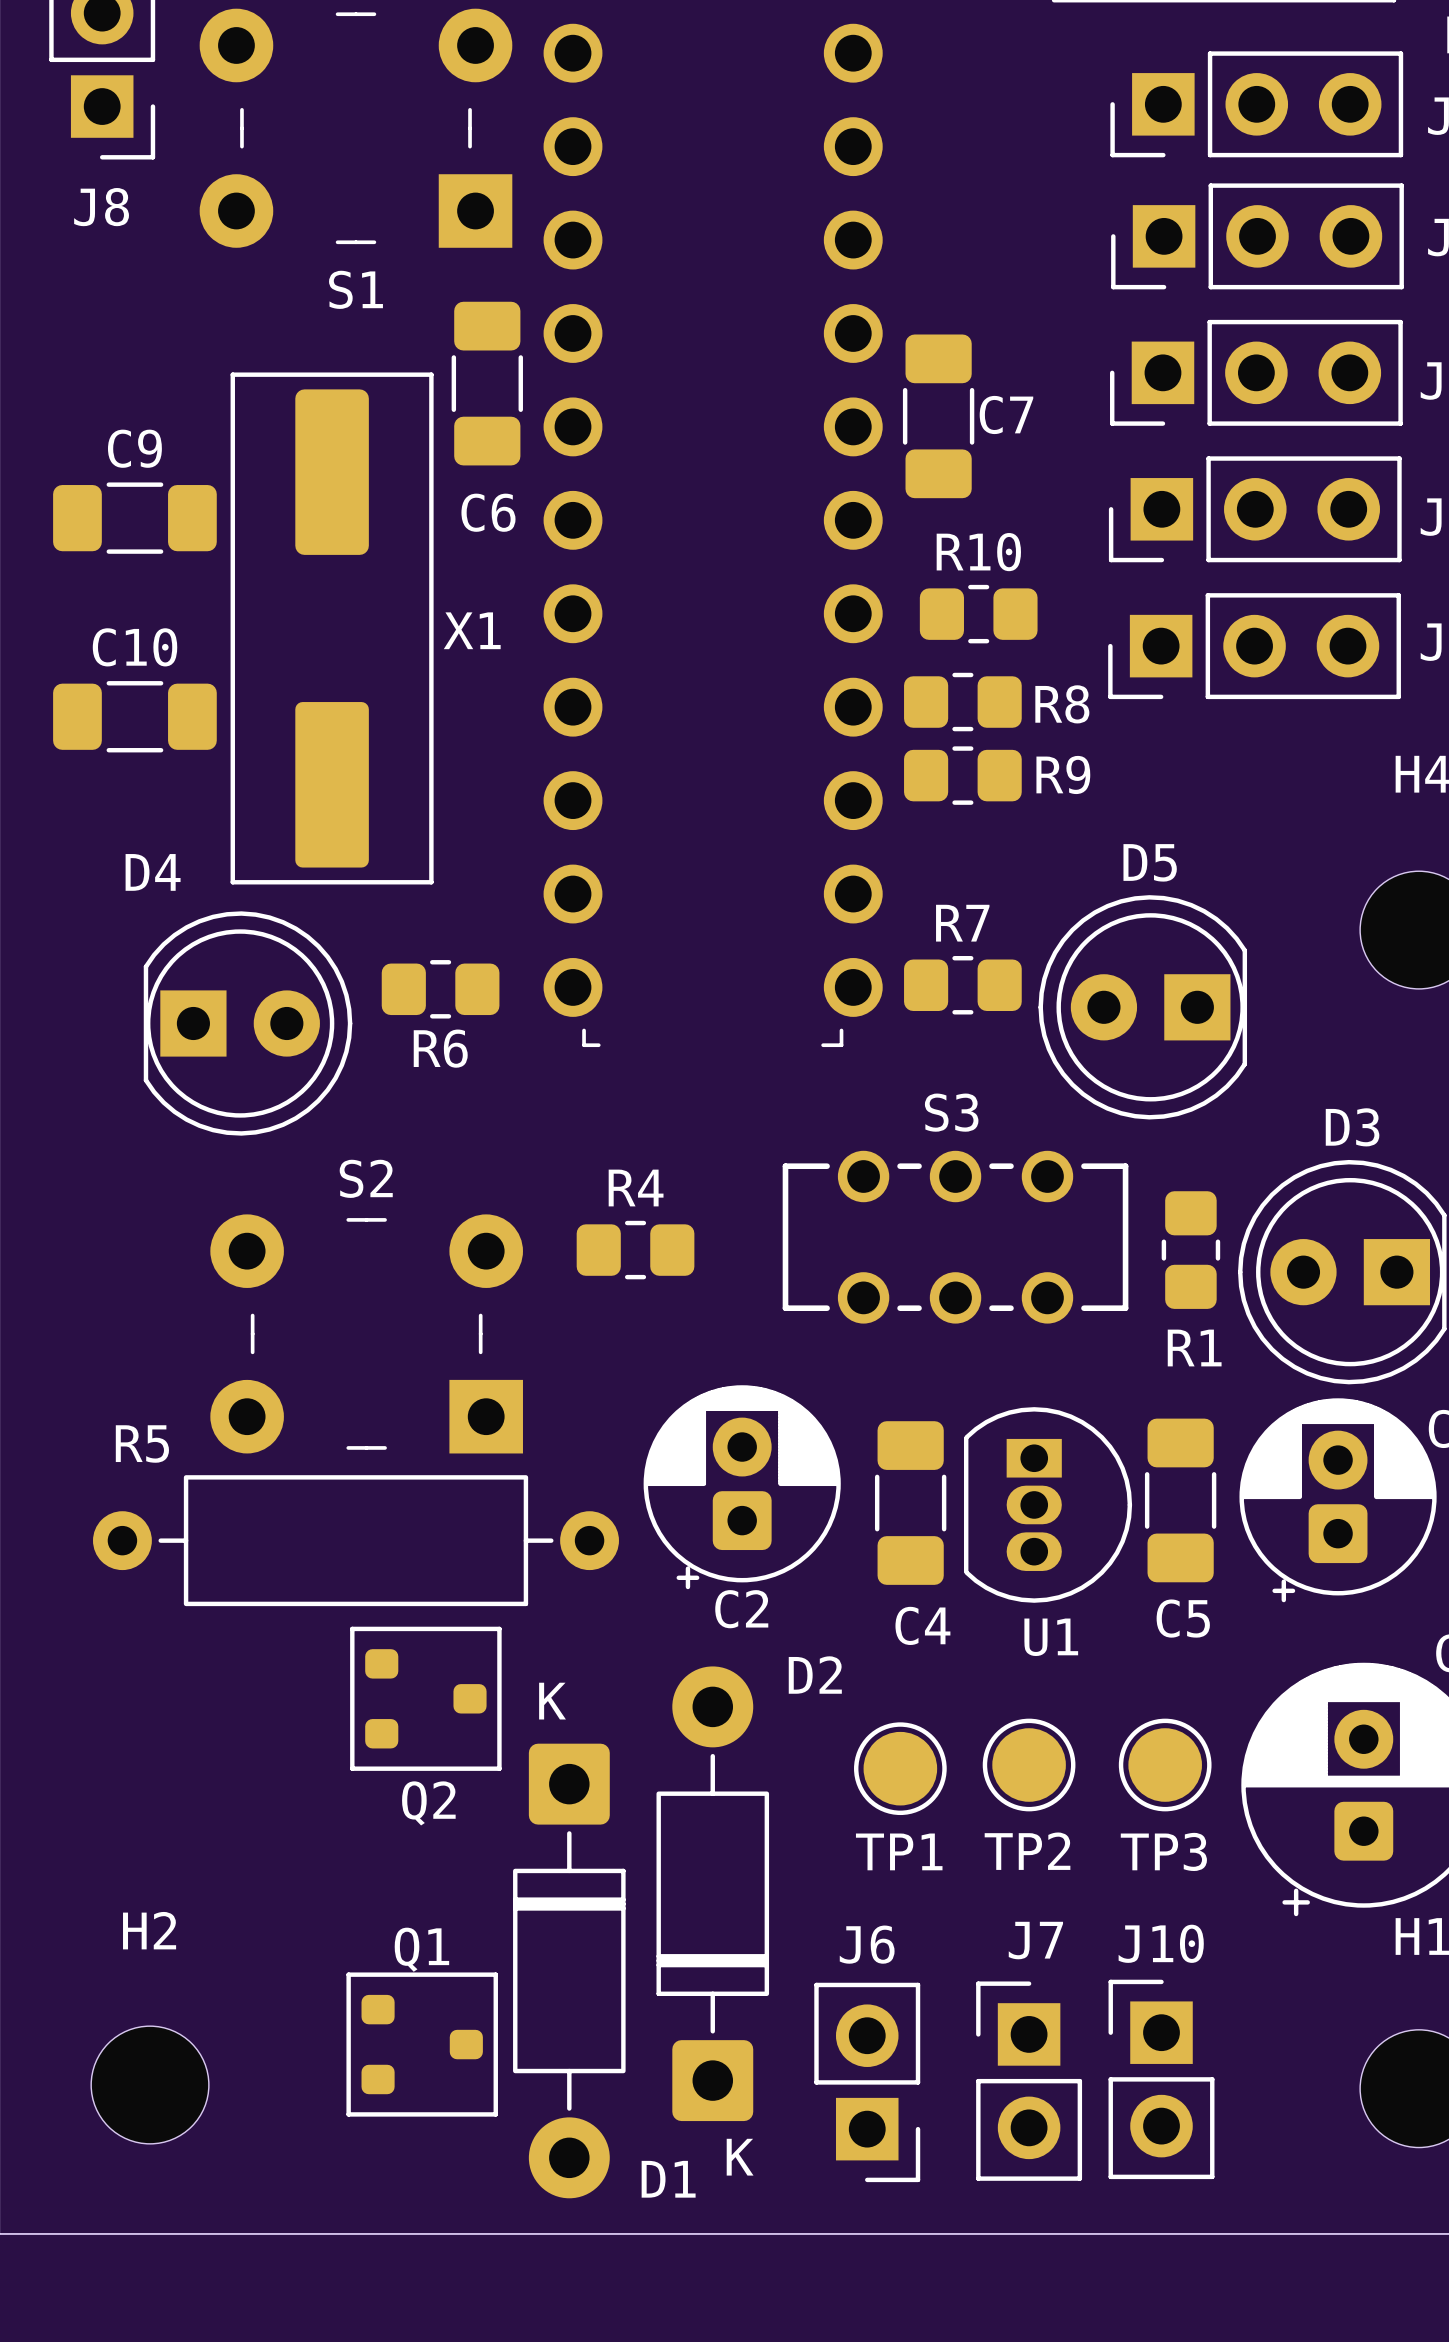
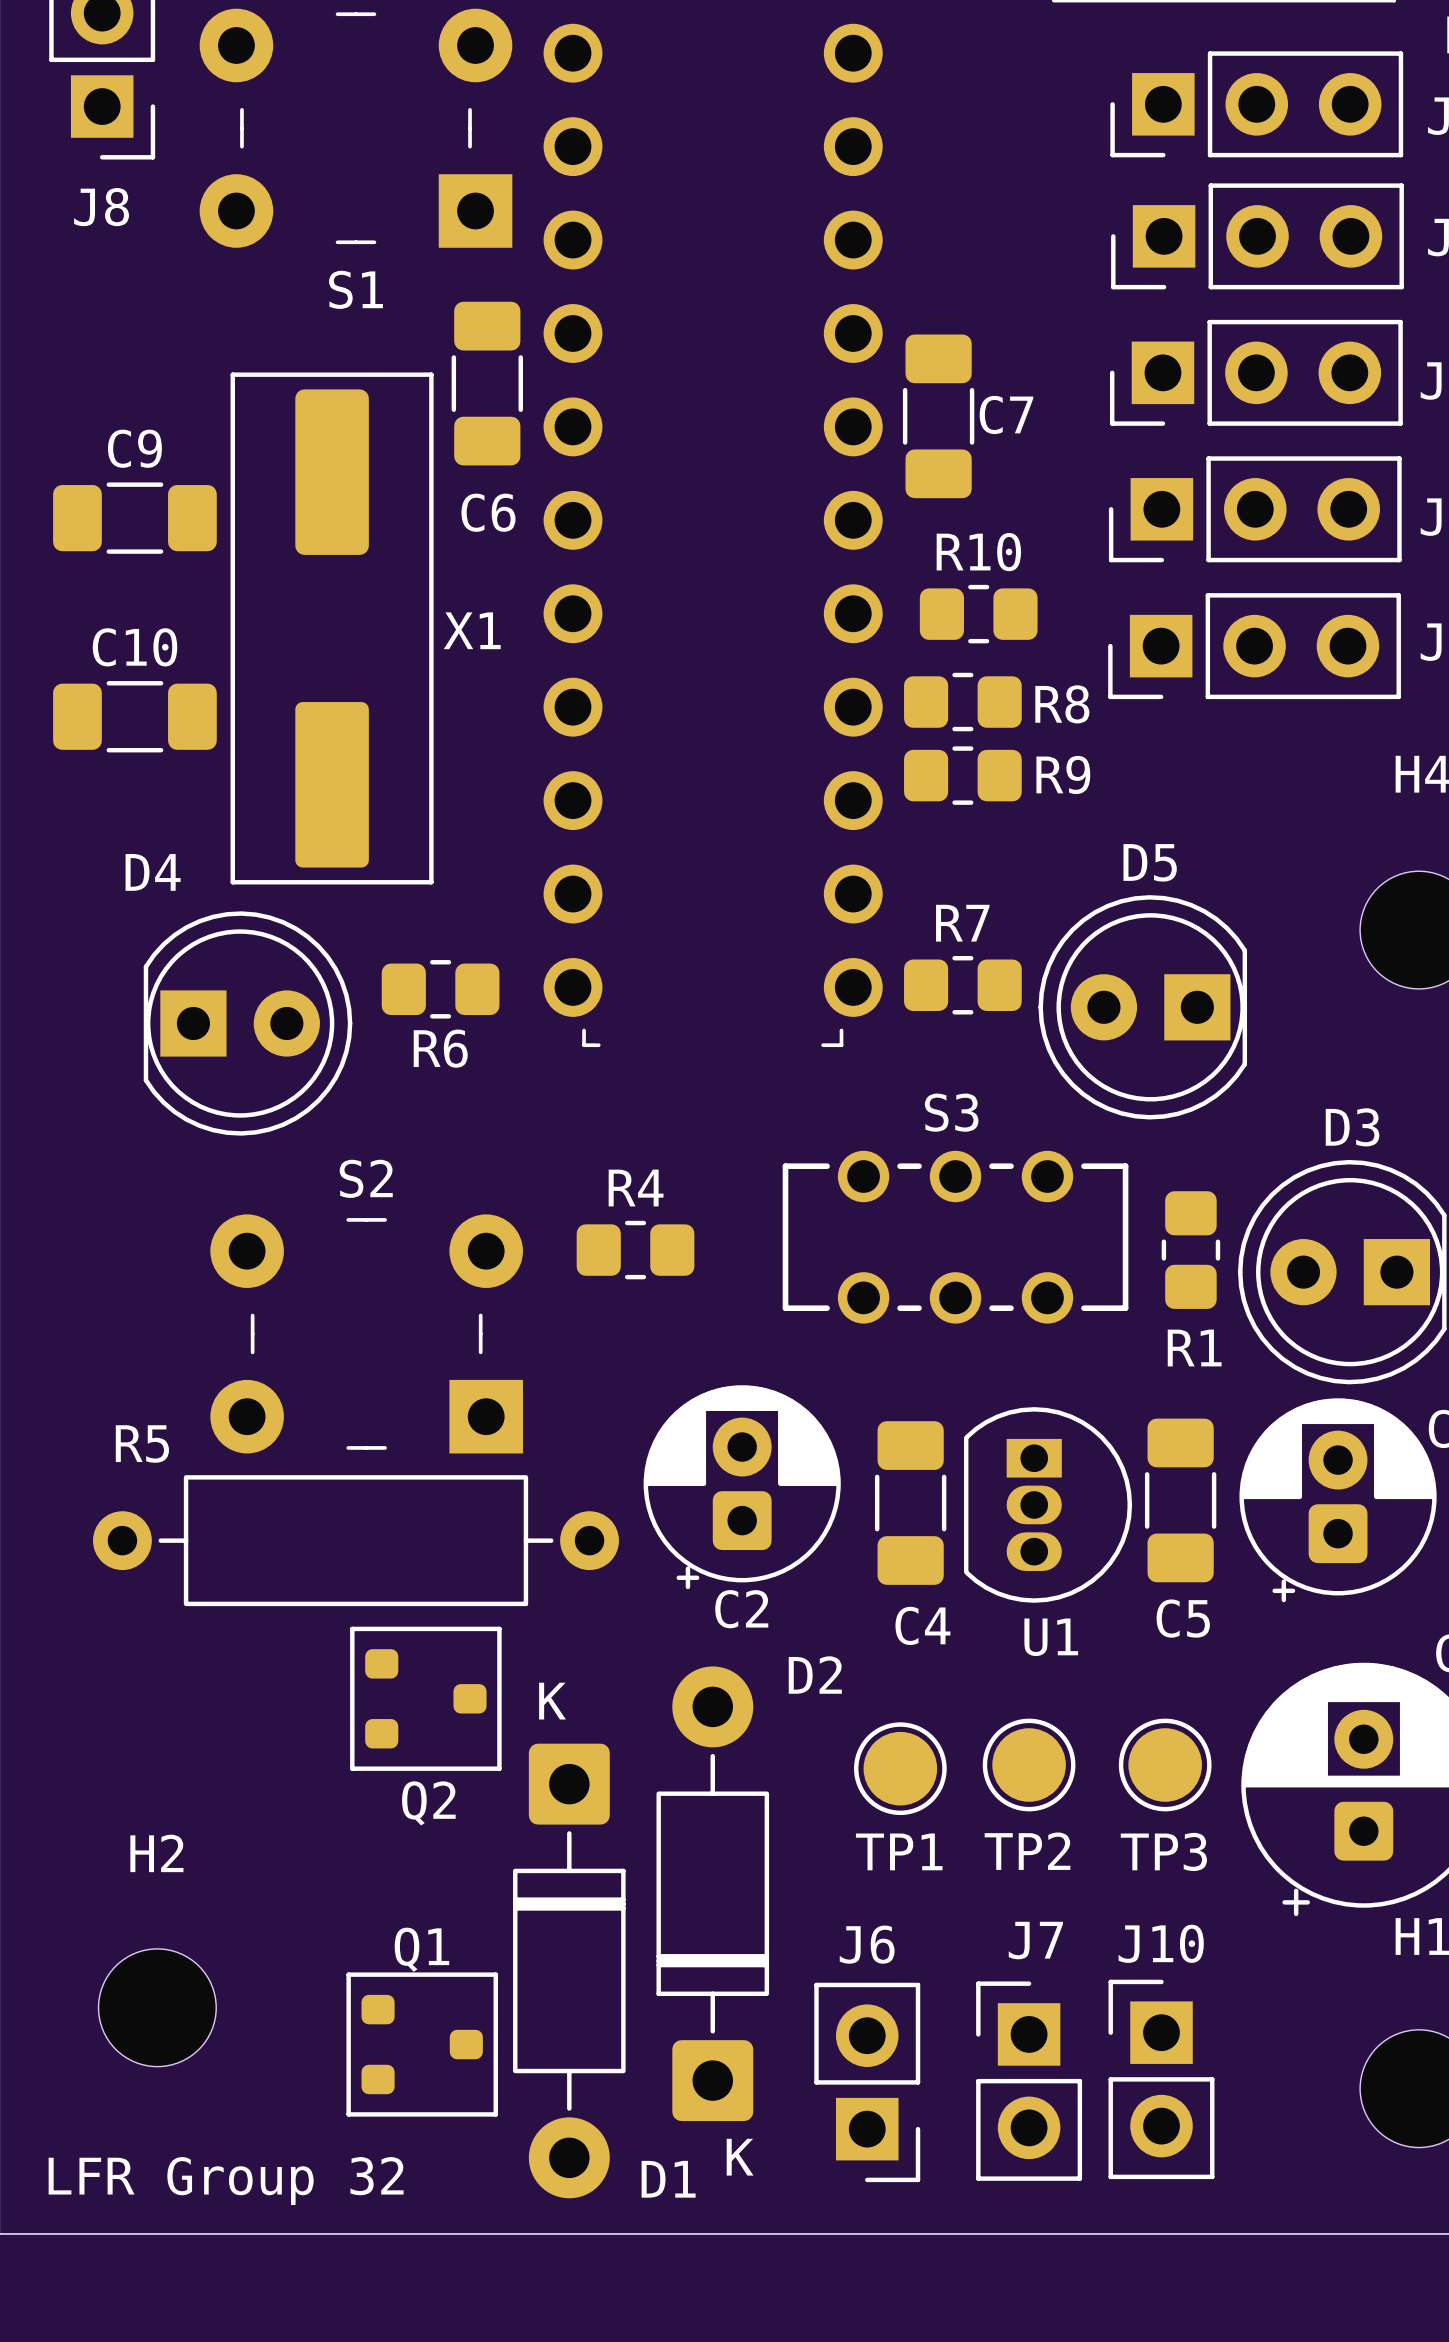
H2 position: (150, 2085) -> (157, 2007)
text: none -> LFR Group 32 (226, 2181)

